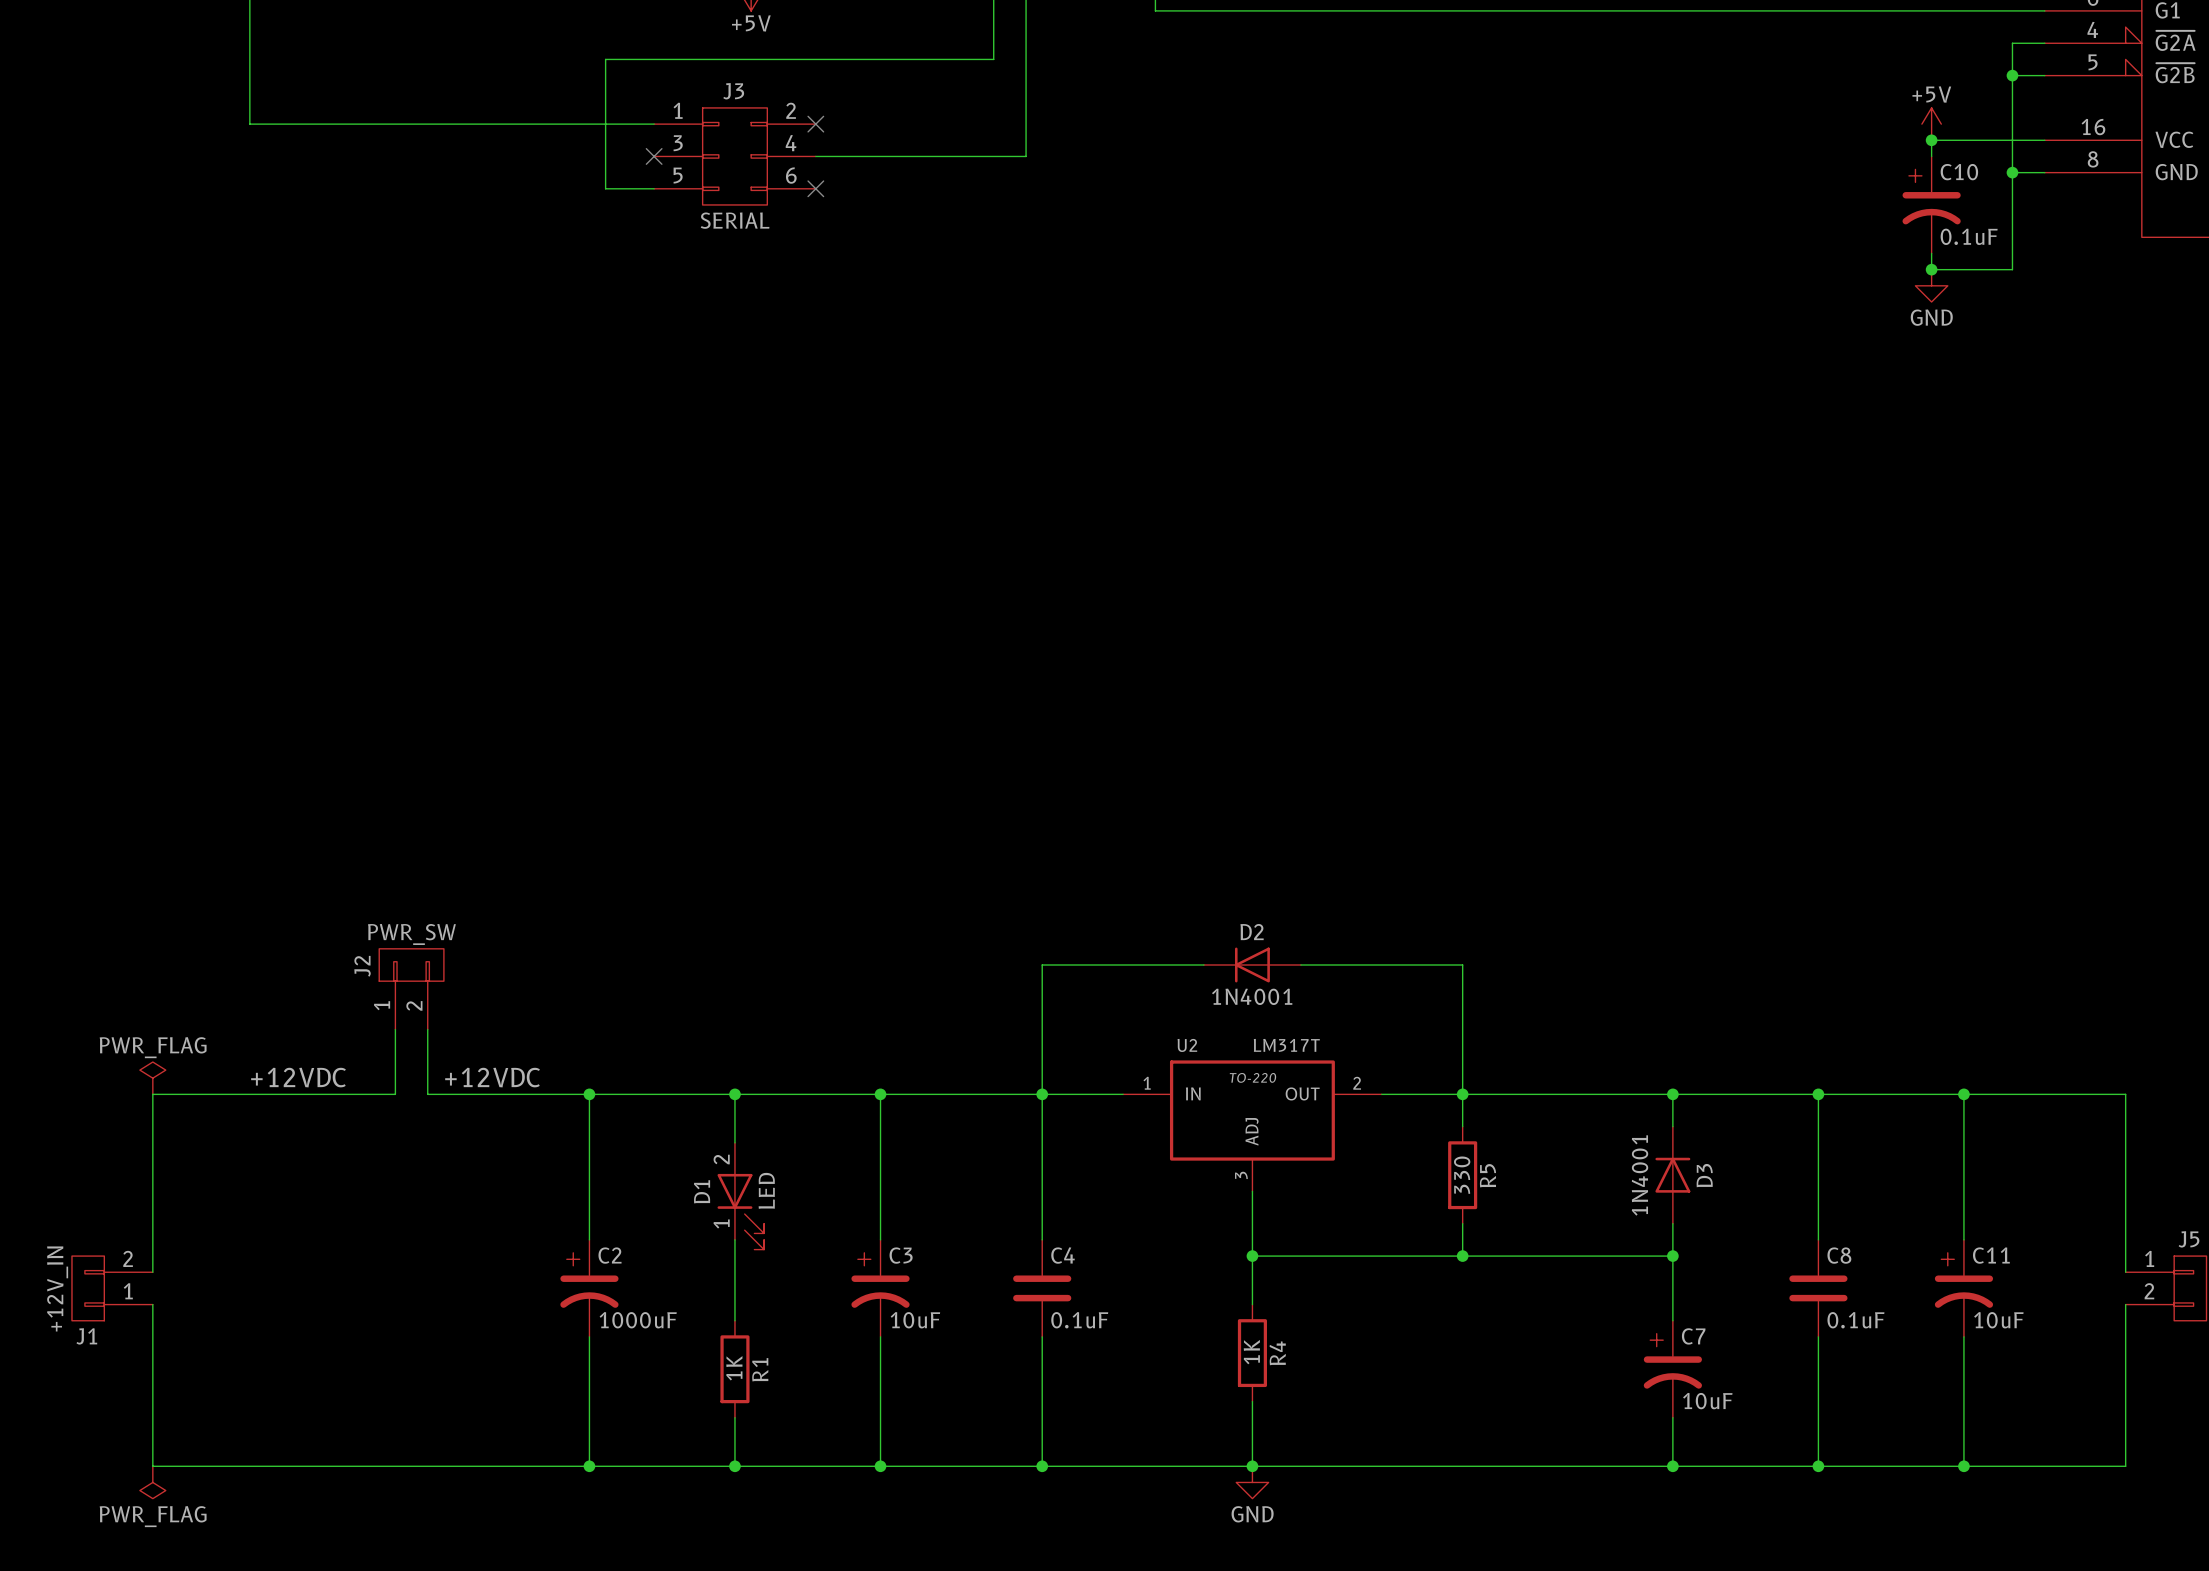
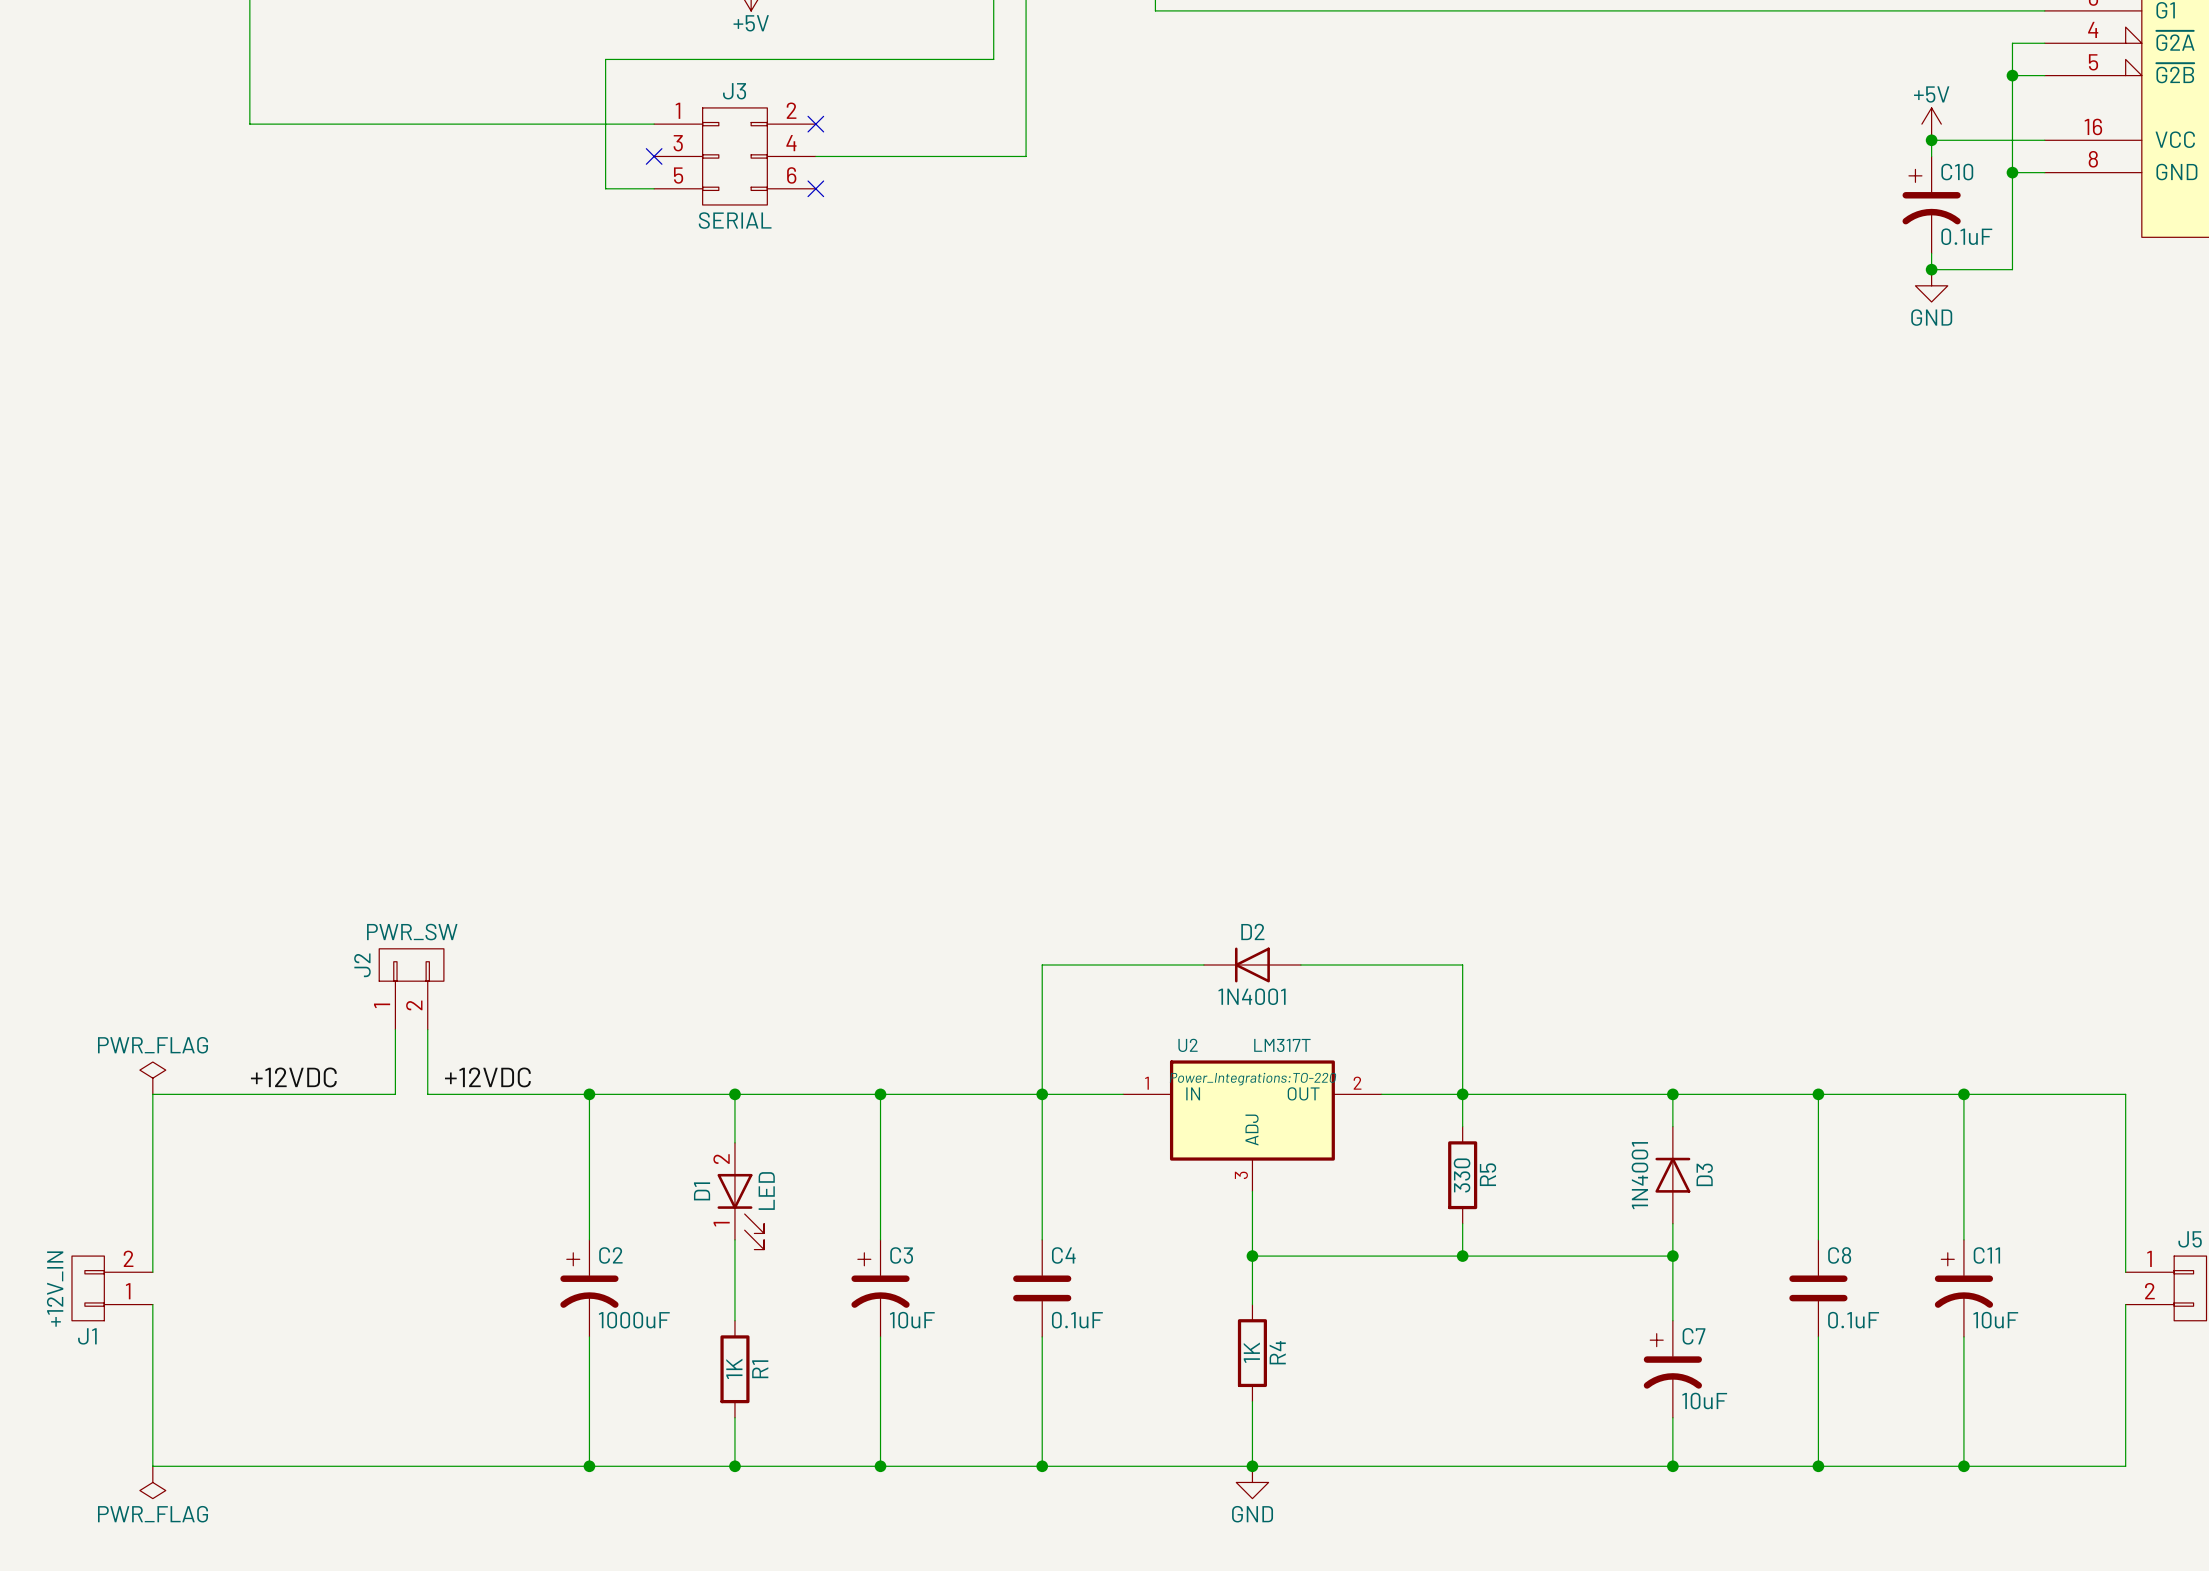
U2 text: TO-220 (1252, 1077) -> Power_Integrations:TO-220 (1253, 1079)

